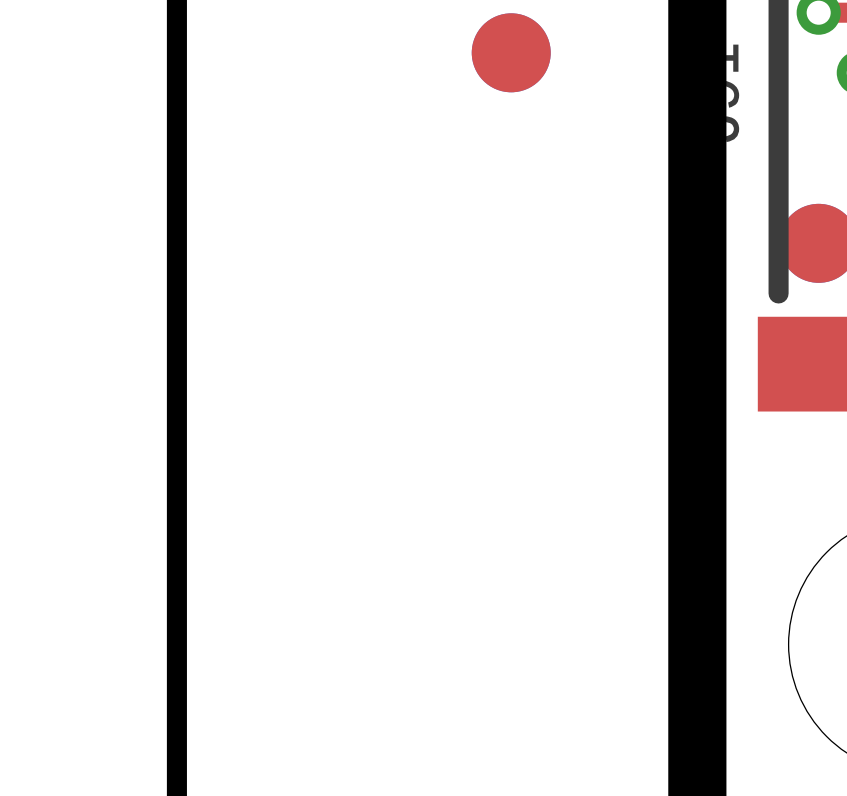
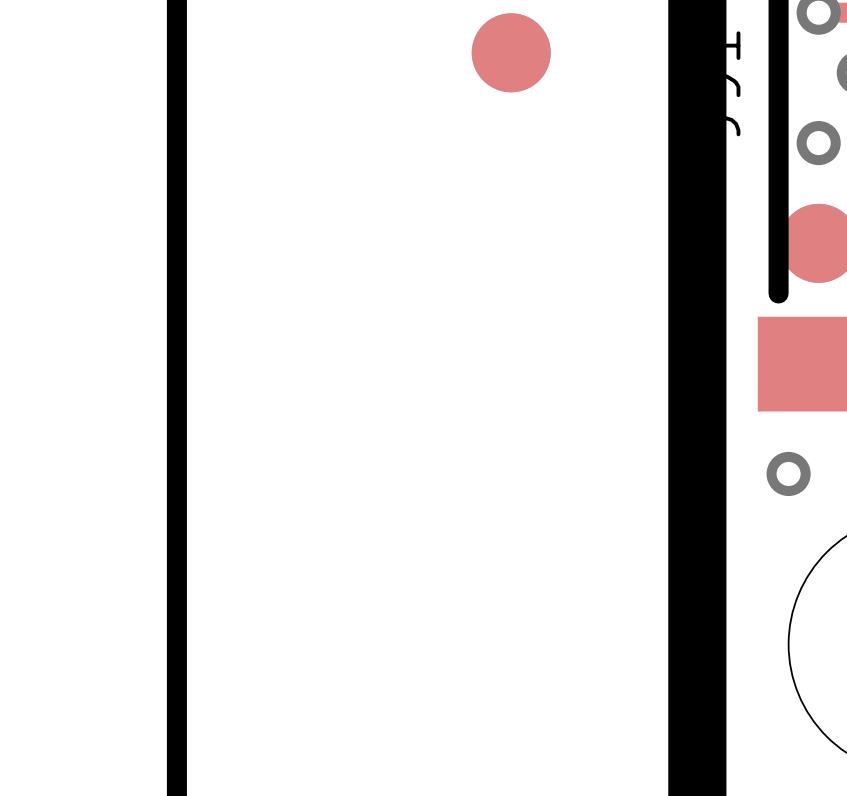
via: none -> (818, 143)
via: none -> (788, 473)

